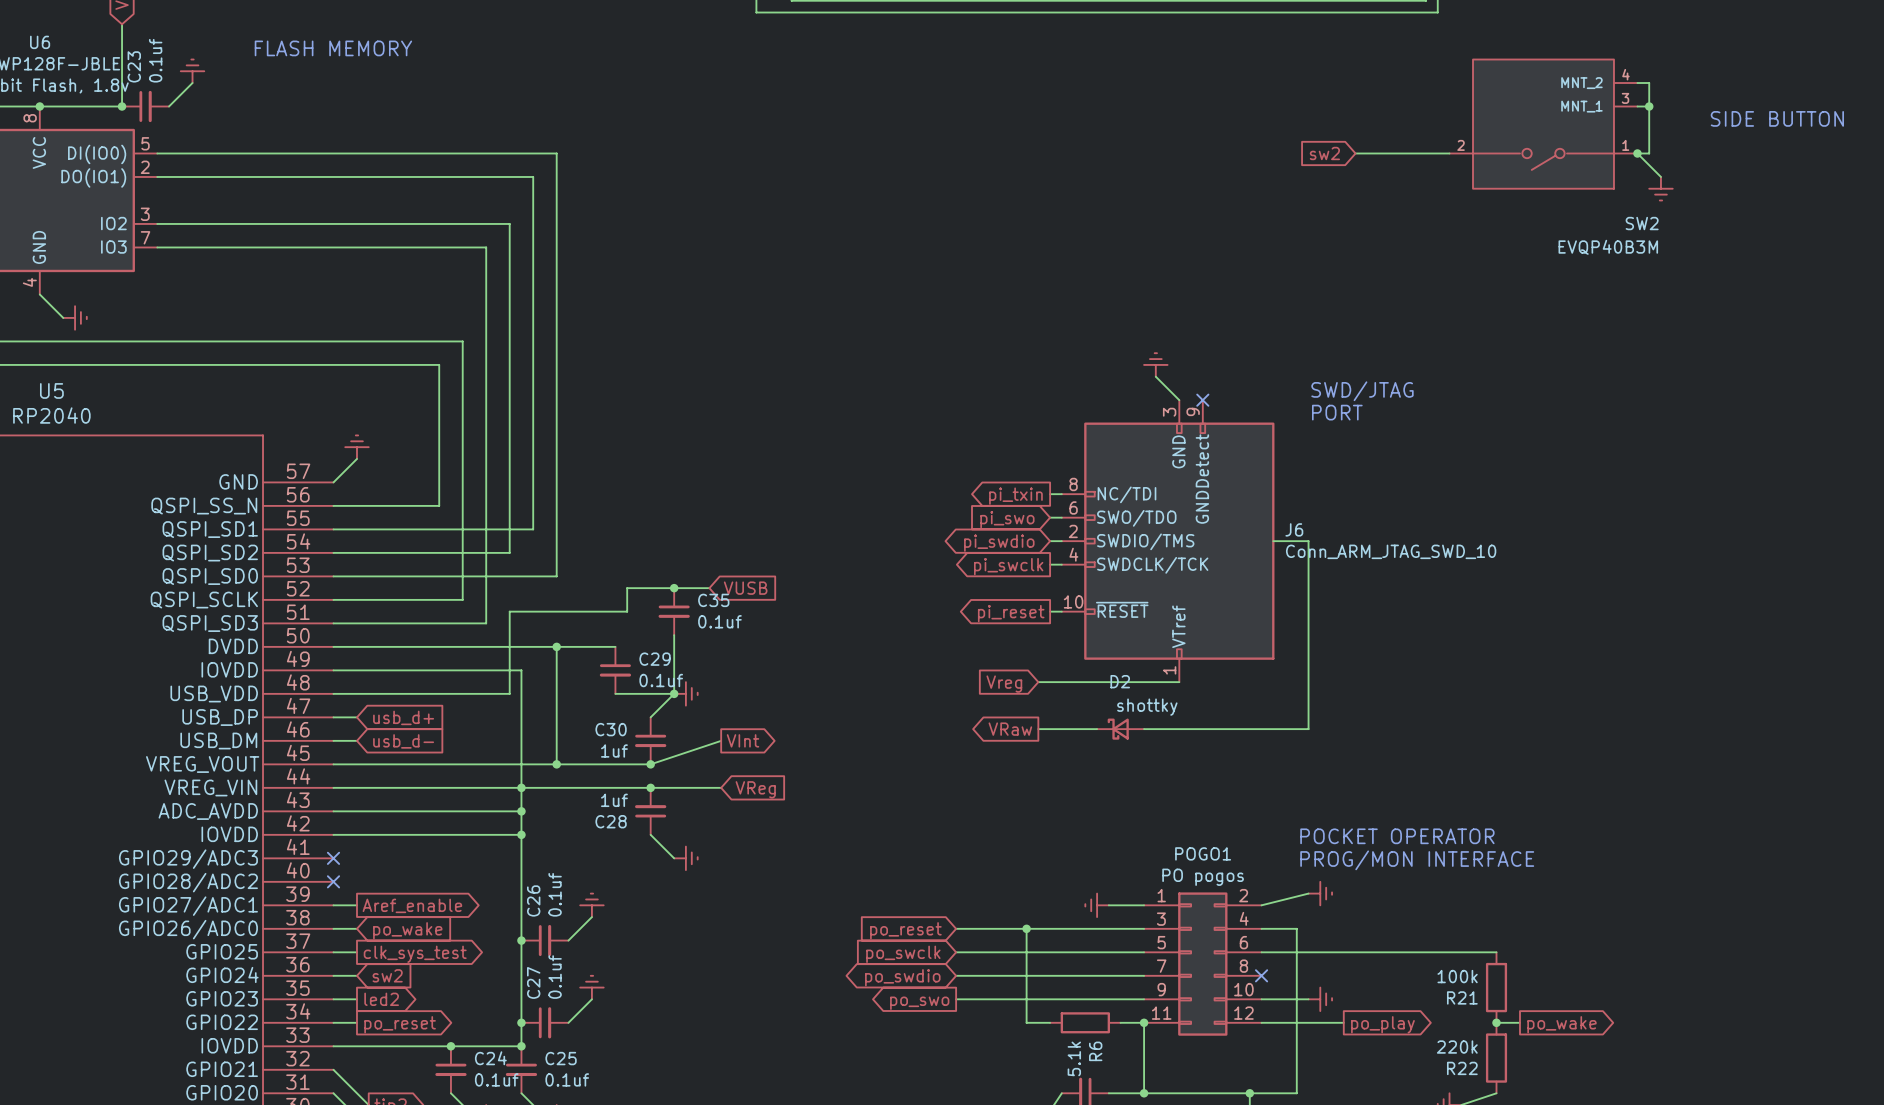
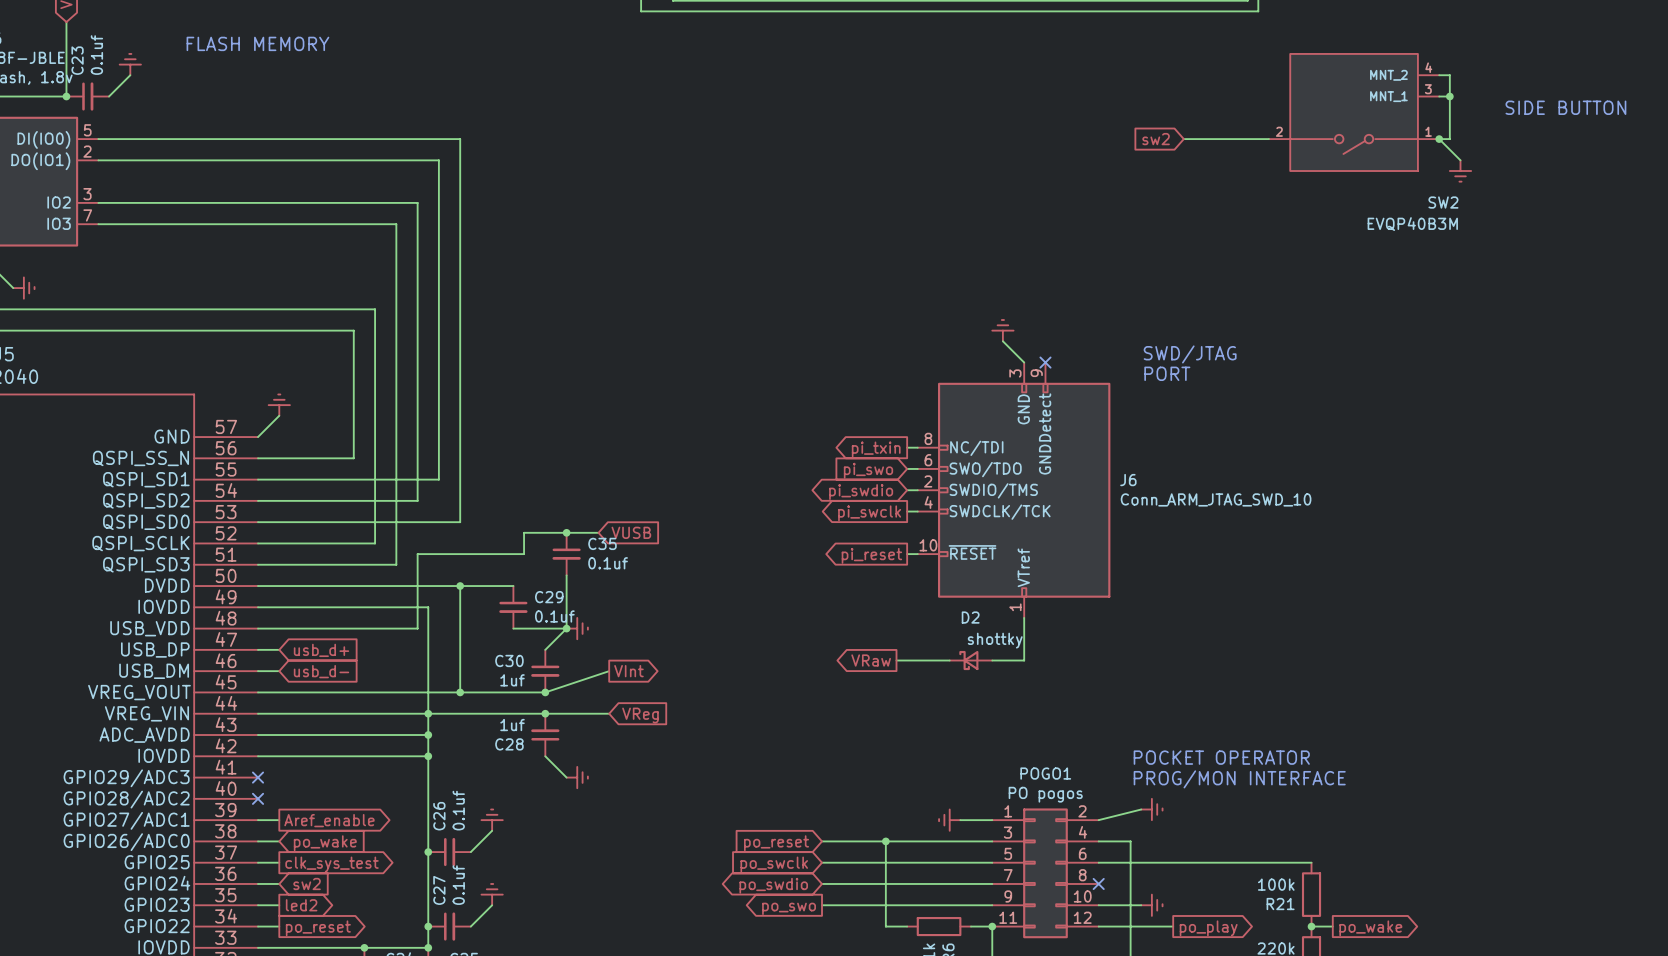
wire: (1273, 541) (1308, 541) (1308, 729) (1179, 729) -> none
wire: (1038, 682) (1179, 682) -> (1024, 660) (1024, 617)
global label: Vreg (1004, 684) -> none

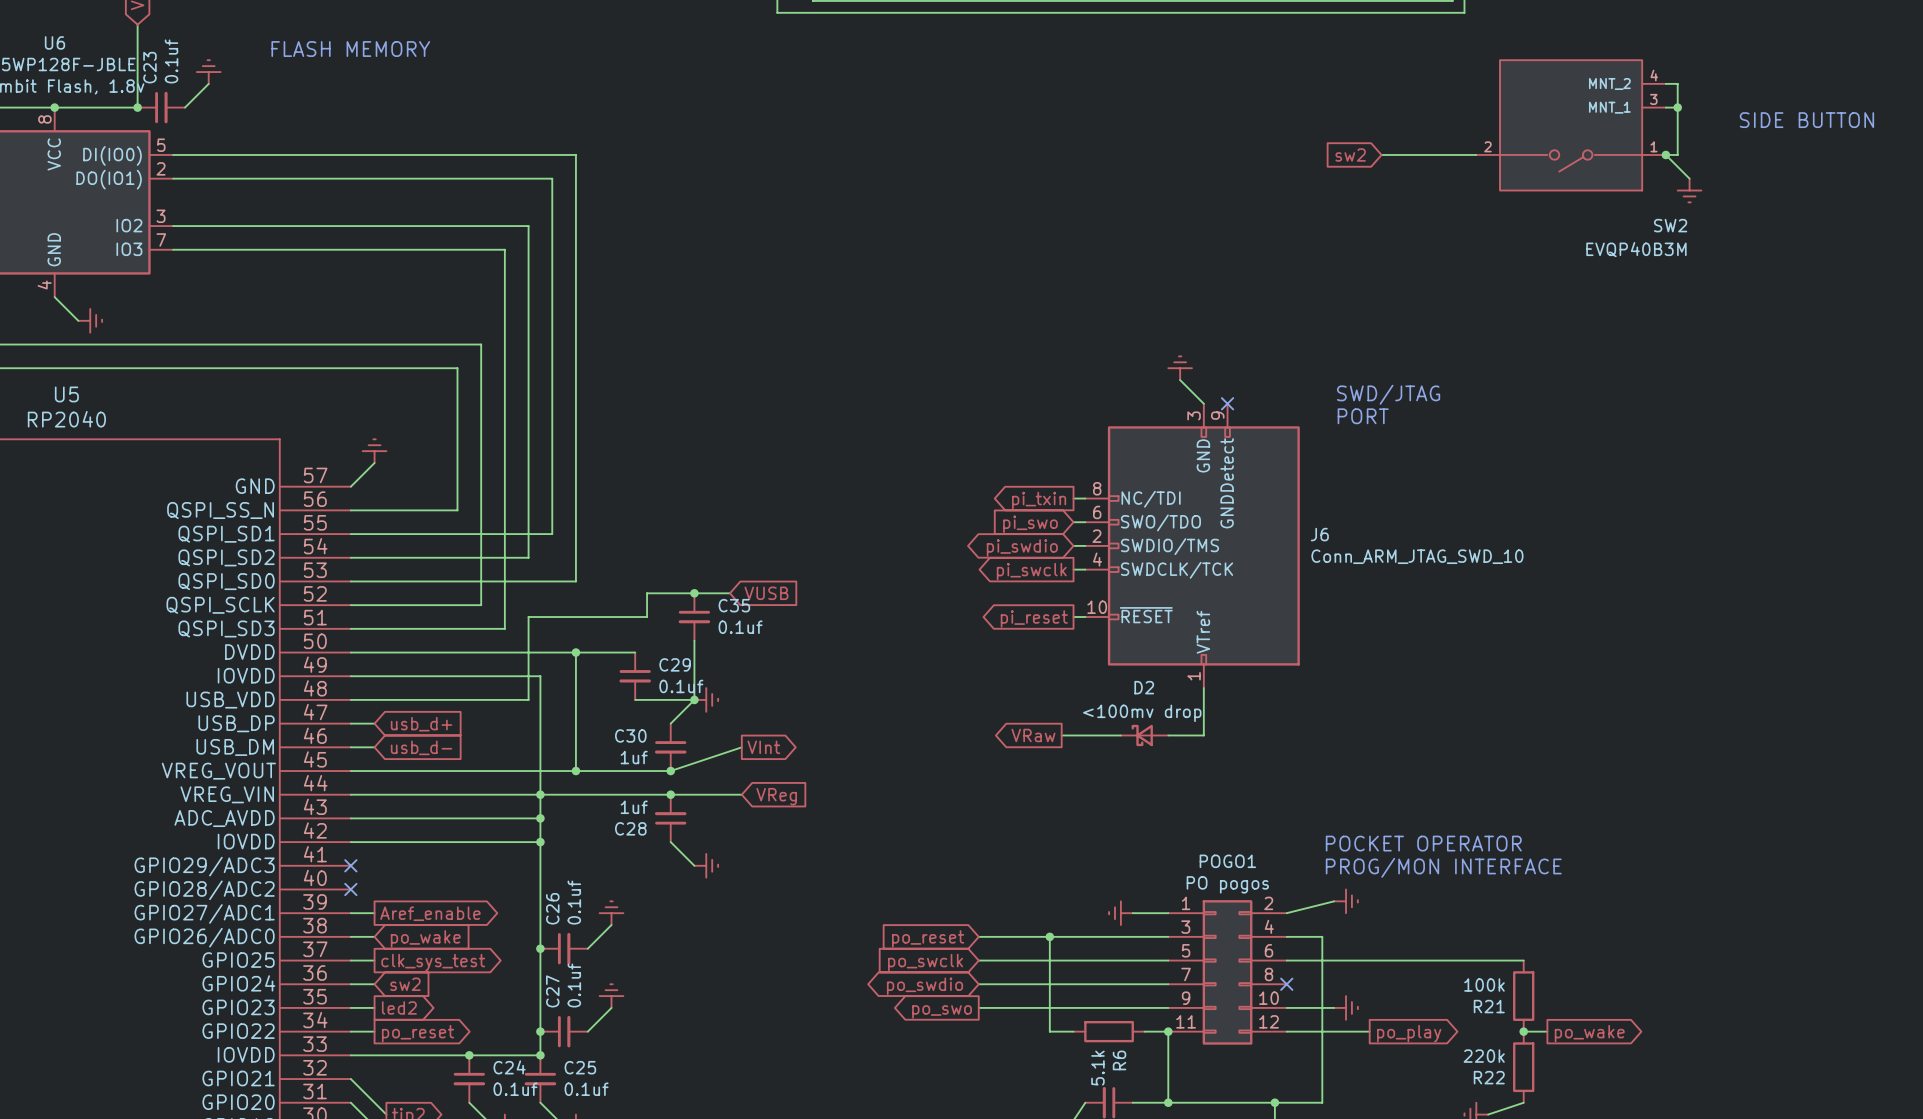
D2 value: shottky (995, 640) -> <100mv drop (1142, 713)

